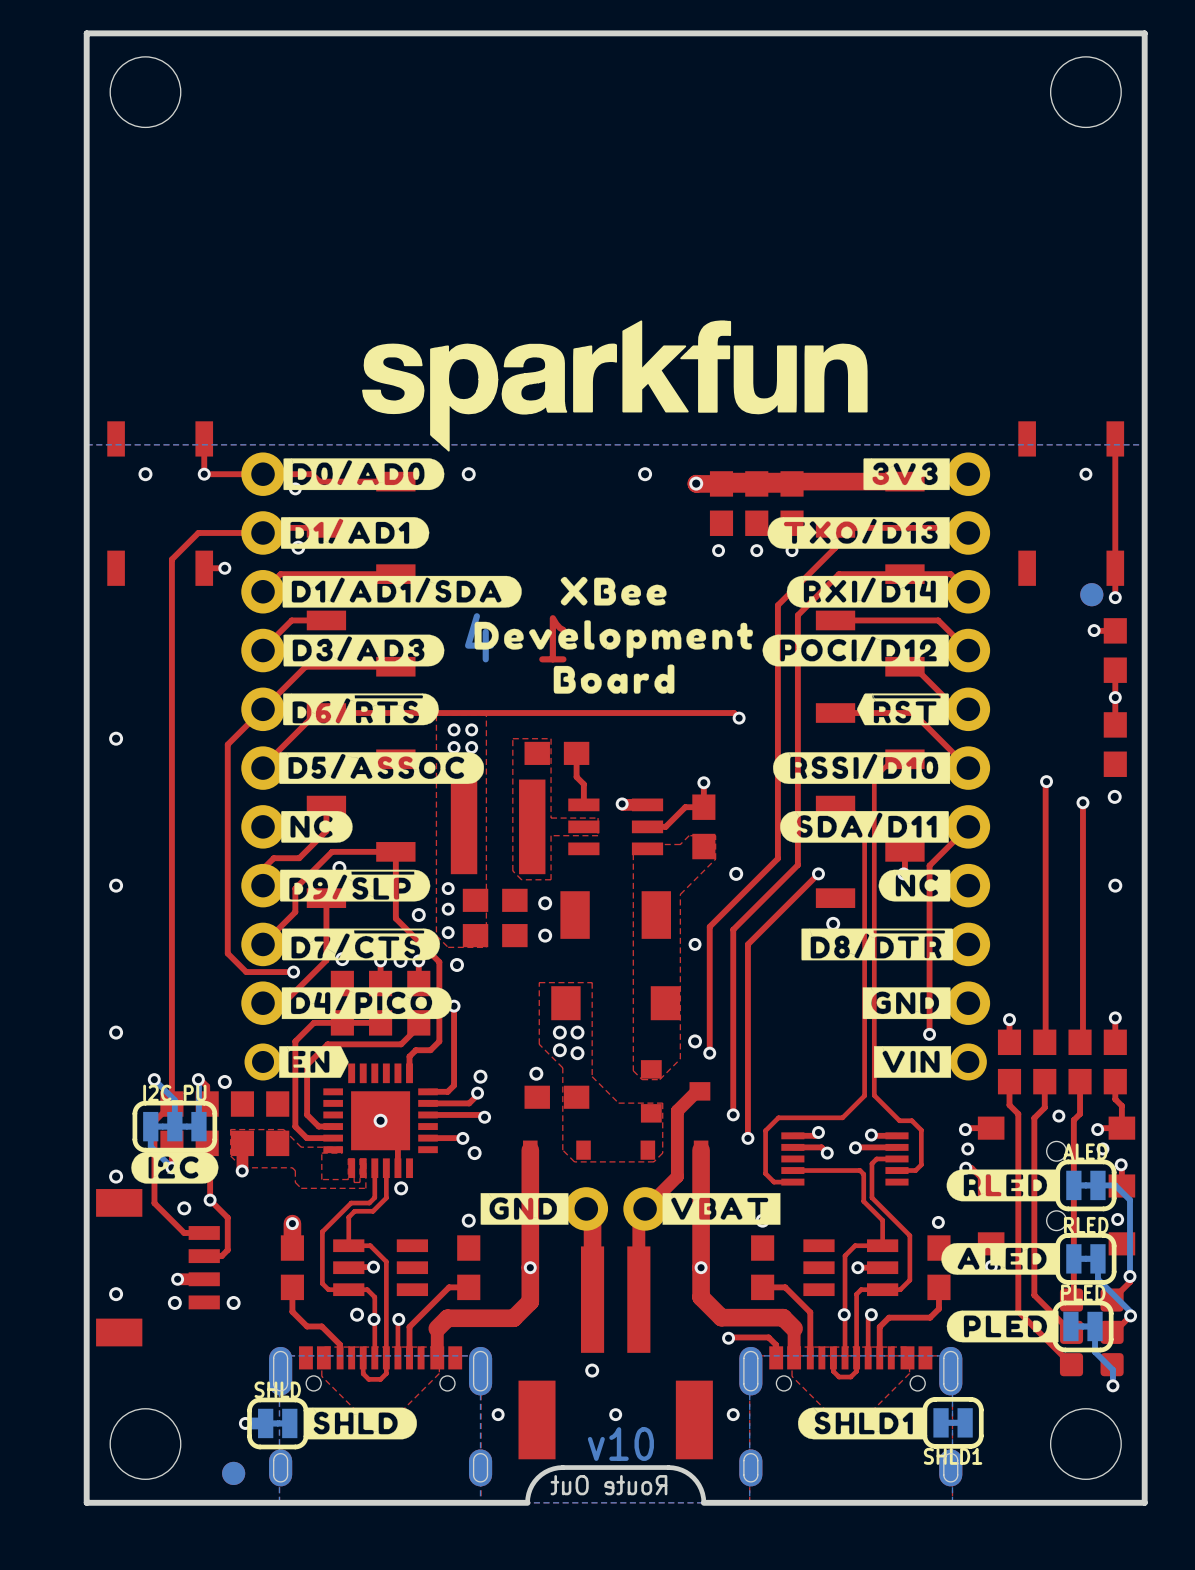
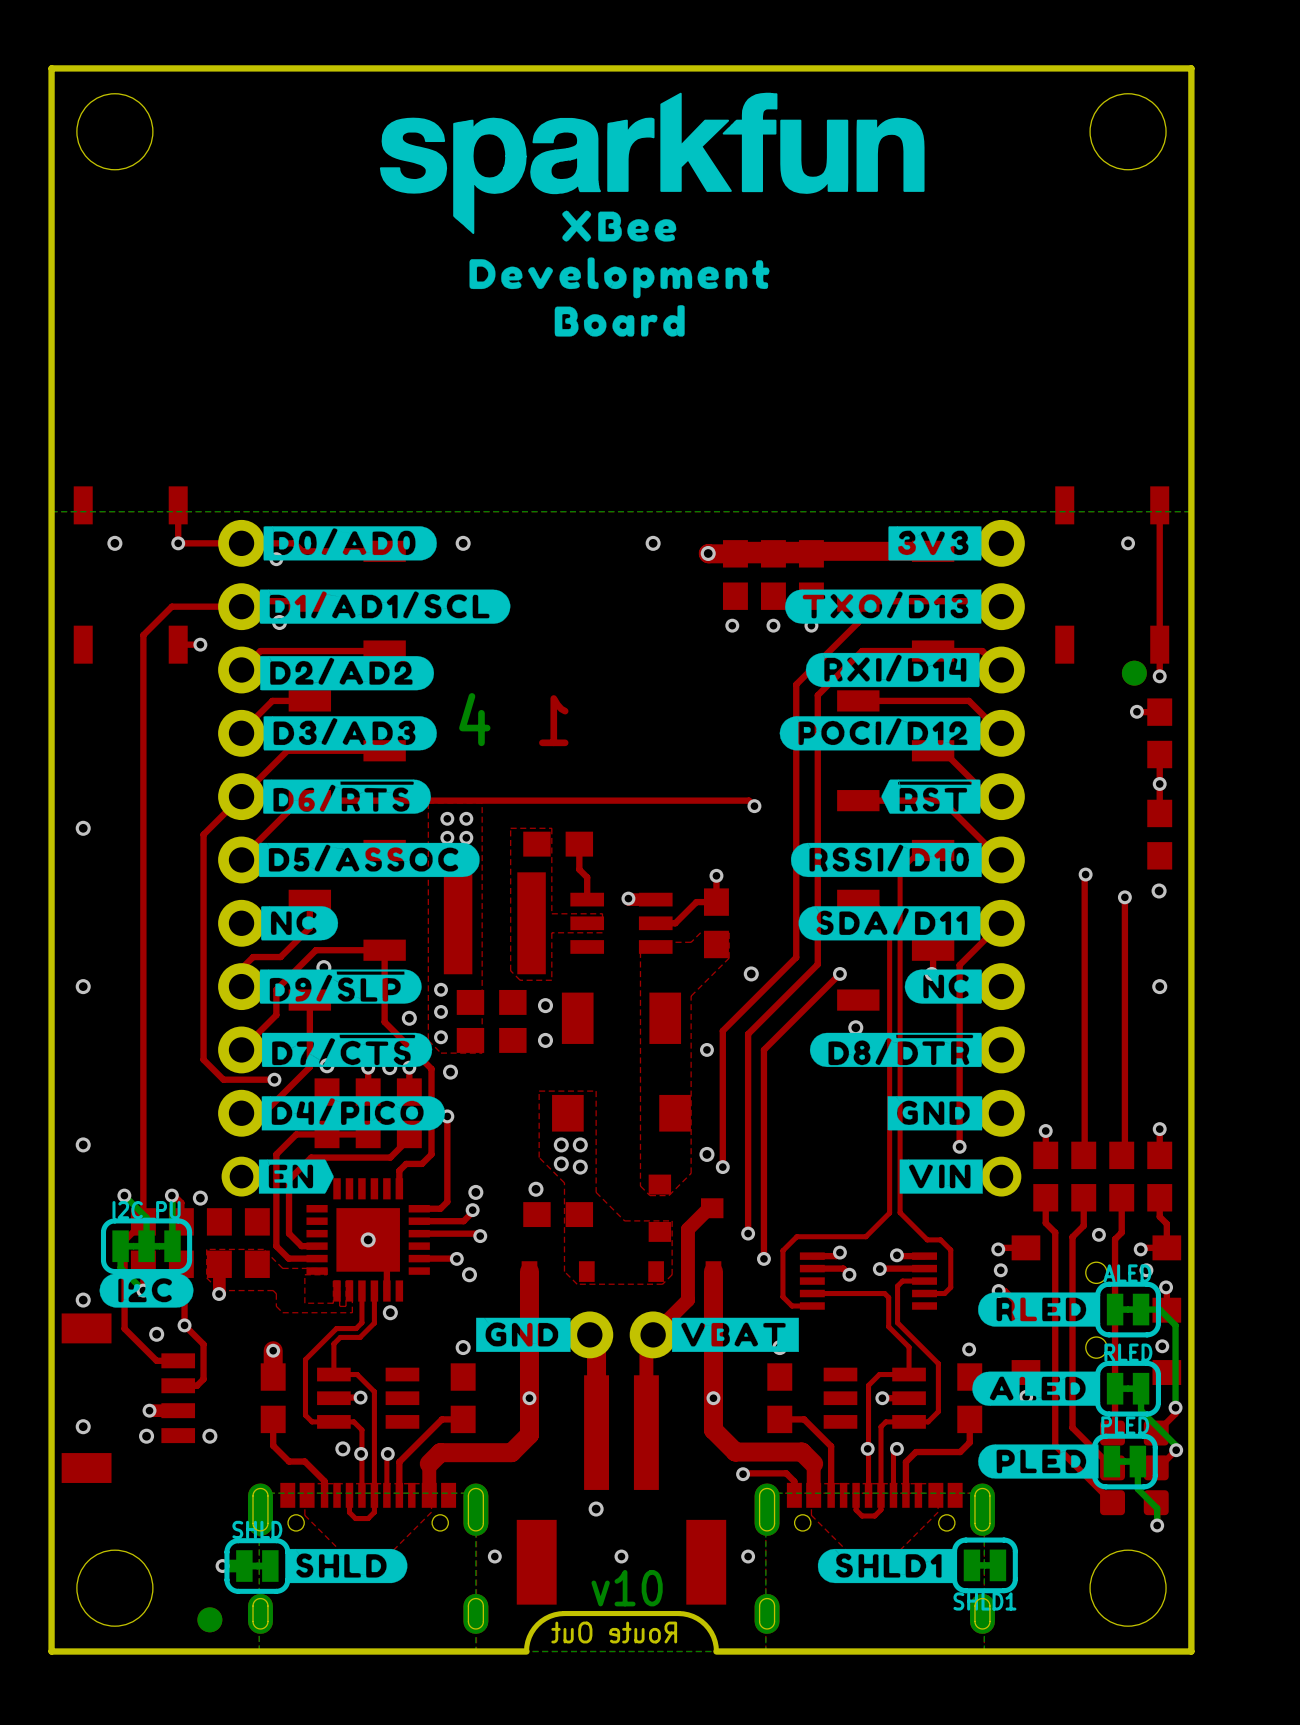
drawing position: (614, 386) -> (652, 163)
drawing: none -> [259, 589, 511, 624]
drawing: [280, 517, 522, 608] -> none
drawing: none -> [260, 656, 434, 691]
drawing position: (613, 591) -> (619, 226)
drawing position: (613, 639) -> (619, 277)
drawing position: (614, 679) -> (619, 320)
drawing shape: [801, 928, 954, 961] -> [809, 1032, 982, 1068]

